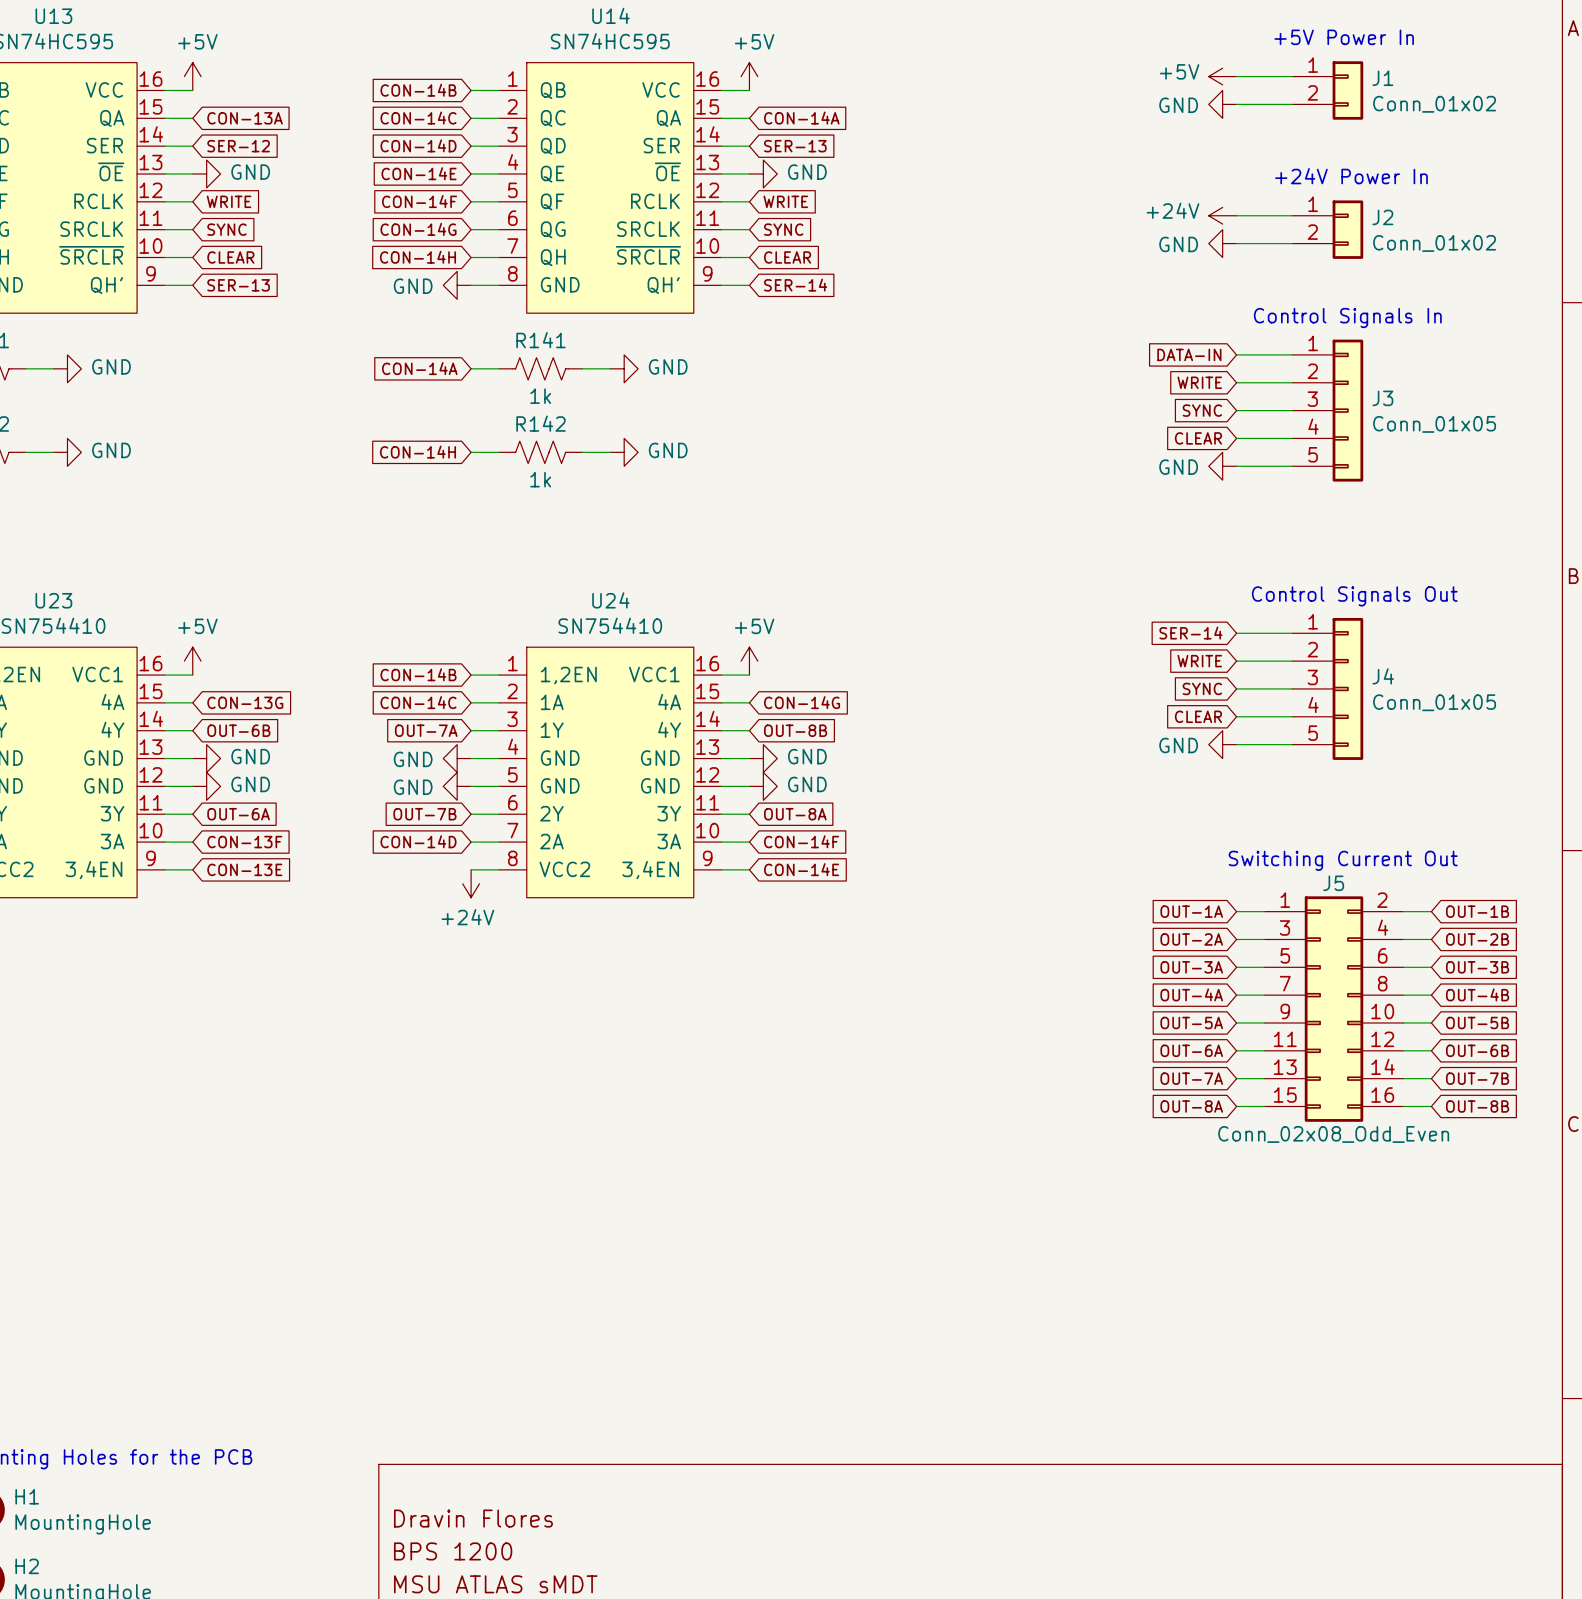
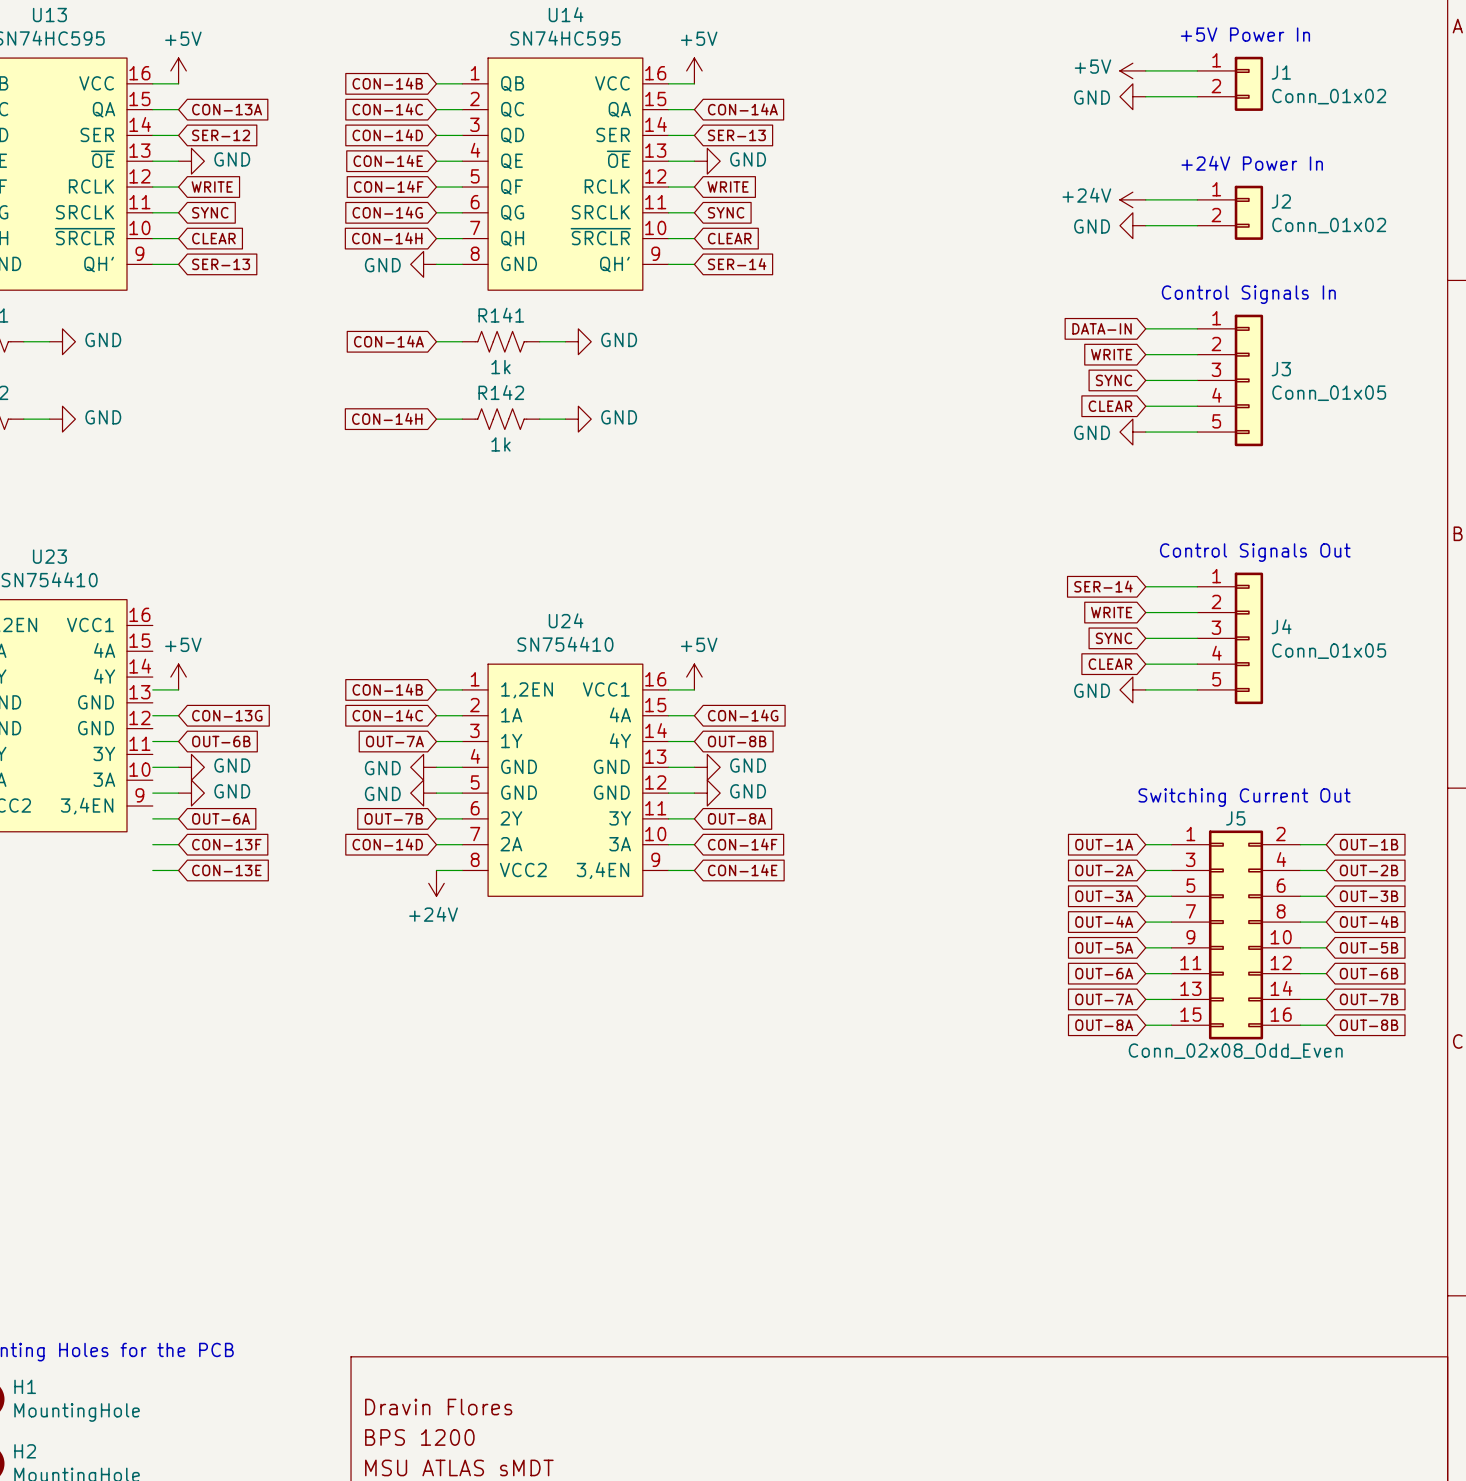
power symbol position: +5V (192, 661) -> +5V (178, 677)
power symbol position: +5V (749, 661) -> +5V (694, 677)
global label position: CON-14B (418, 674) -> CON-14B (387, 689)
wire: (164, 675) (192, 675) -> (152, 689) (178, 689)
wire: (471, 675) (498, 675) -> (436, 689) (462, 689)
wire: (721, 675) (749, 675) -> (668, 689) (694, 689)
wire: (164, 702) (192, 702) -> (152, 715) (178, 715)
global label position: CON-13G (245, 702) -> CON-13G (227, 715)
global label position: CON-14C (418, 702) -> CON-14C (387, 715)
wire: (471, 702) (498, 702) -> (436, 715) (462, 715)
wire: (721, 702) (749, 702) -> (668, 715) (694, 715)
global label position: CON-14G (802, 702) -> CON-14G (743, 715)
wire: (164, 730) (192, 730) -> (152, 741) (178, 741)
global label position: OUT-6B (238, 730) -> OUT-6B (221, 741)
global label position: OUT-7A (426, 730) -> OUT-7A (394, 741)
wire: (471, 730) (498, 730) -> (436, 741) (462, 741)
wire: (721, 730) (749, 730) -> (668, 741) (694, 741)
global label position: OUT-8B (795, 730) -> OUT-8B (737, 741)
wire: (164, 758) (192, 758) -> (152, 767) (178, 767)
power symbol: GND (206, 758) -> none
power symbol: GND (457, 758) -> none
wire: (471, 758) (498, 758) -> (436, 767) (462, 767)
wire: (721, 758) (749, 758) -> (668, 767) (694, 767)
power symbol: GND (763, 758) -> none
U24 position: (610, 772) -> (565, 780)
wire: (164, 786) (192, 786) -> (152, 793) (178, 793)
power symbol: GND (206, 786) -> none
power symbol: GND (457, 786) -> none
wire: (471, 786) (498, 786) -> (436, 793) (462, 793)
wire: (721, 786) (749, 786) -> (668, 793) (694, 793)
power symbol: GND (763, 786) -> none
wire: (164, 814) (192, 814) -> (152, 818) (178, 818)
global label position: OUT-6A (238, 814) -> OUT-6A (221, 818)
global label position: OUT-7B (424, 814) -> OUT-7B (393, 818)
wire: (471, 814) (498, 814) -> (436, 818) (462, 818)
wire: (721, 814) (749, 814) -> (668, 818) (694, 818)
global label position: OUT-8A (795, 814) -> OUT-8A (736, 818)
power symbol: none -> GND (191, 767)
power symbol: none -> GND (423, 767)
power symbol: none -> GND (707, 767)
global label position: CON-14D (418, 841) -> CON-14D (387, 844)
global label position: CON-14F (801, 841) -> CON-14F (742, 844)
wire: (164, 842) (192, 842) -> (152, 844) (178, 844)
global label position: CON-13F (244, 842) -> CON-13F (226, 844)
wire: (471, 842) (498, 842) -> (436, 844) (462, 844)
wire: (721, 842) (749, 842) -> (668, 844) (694, 844)
power symbol: none -> GND (191, 793)
power symbol: none -> GND (423, 793)
power symbol: none -> GND (707, 793)
wire: (164, 869) (192, 869) -> (152, 870) (178, 870)
global label position: CON-13E (244, 869) -> CON-13E (226, 870)
wire: (471, 869) (498, 869) -> (436, 870) (462, 870)
wire: (721, 869) (749, 869) -> (668, 870) (694, 870)
global label position: CON-14E (801, 869) -> CON-14E (742, 870)
power symbol position: +24V (471, 883) -> +24V (436, 883)

